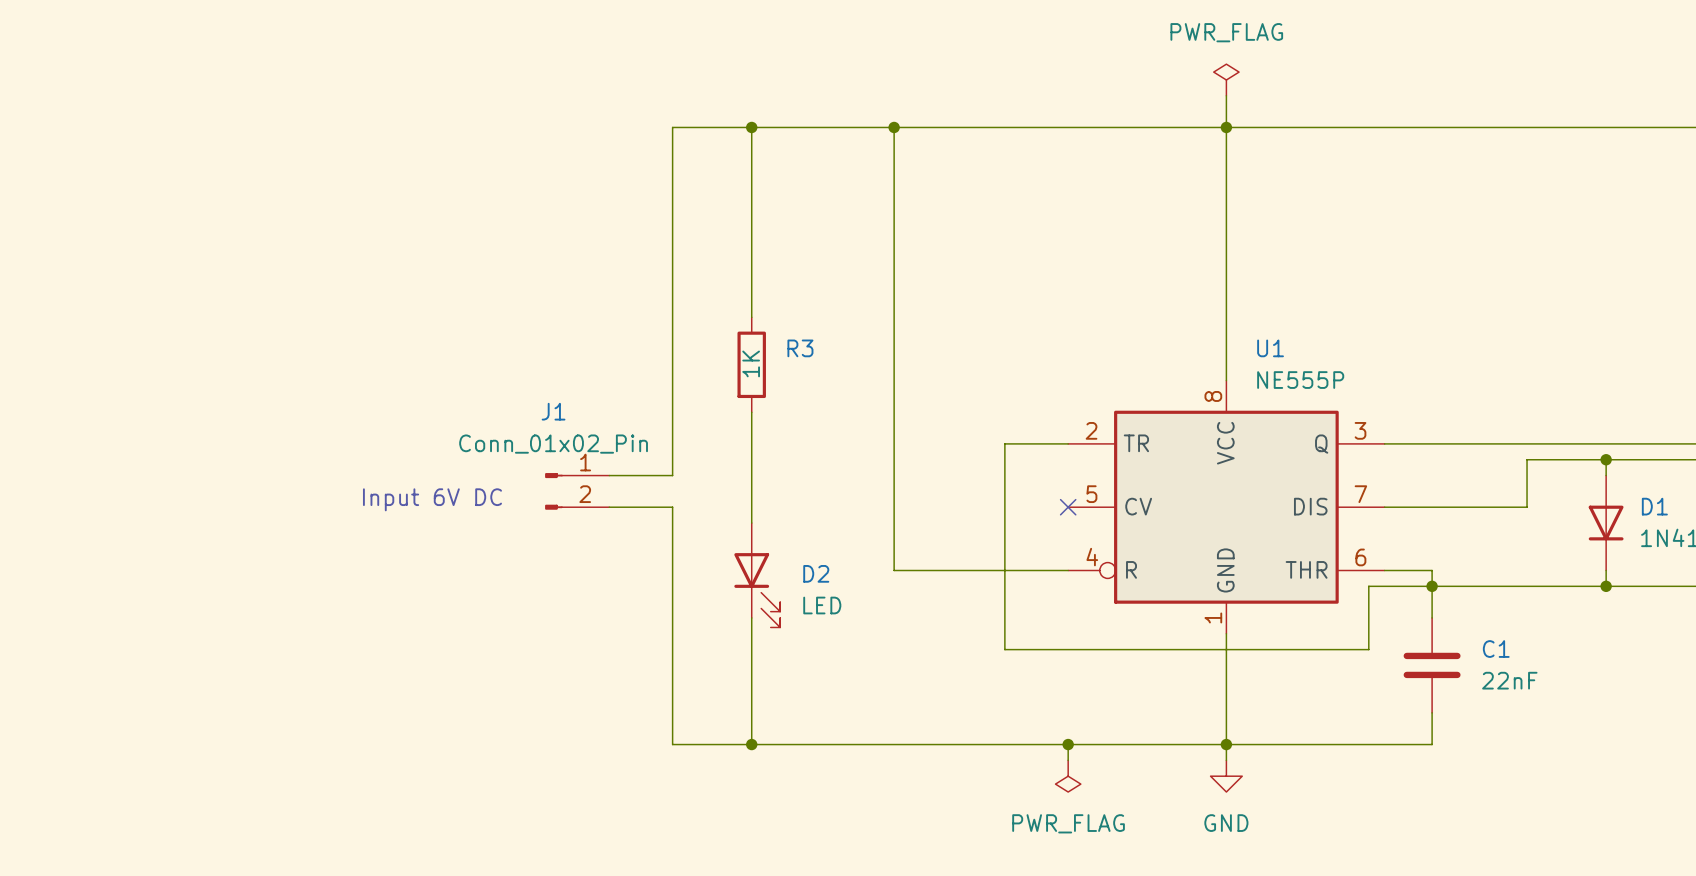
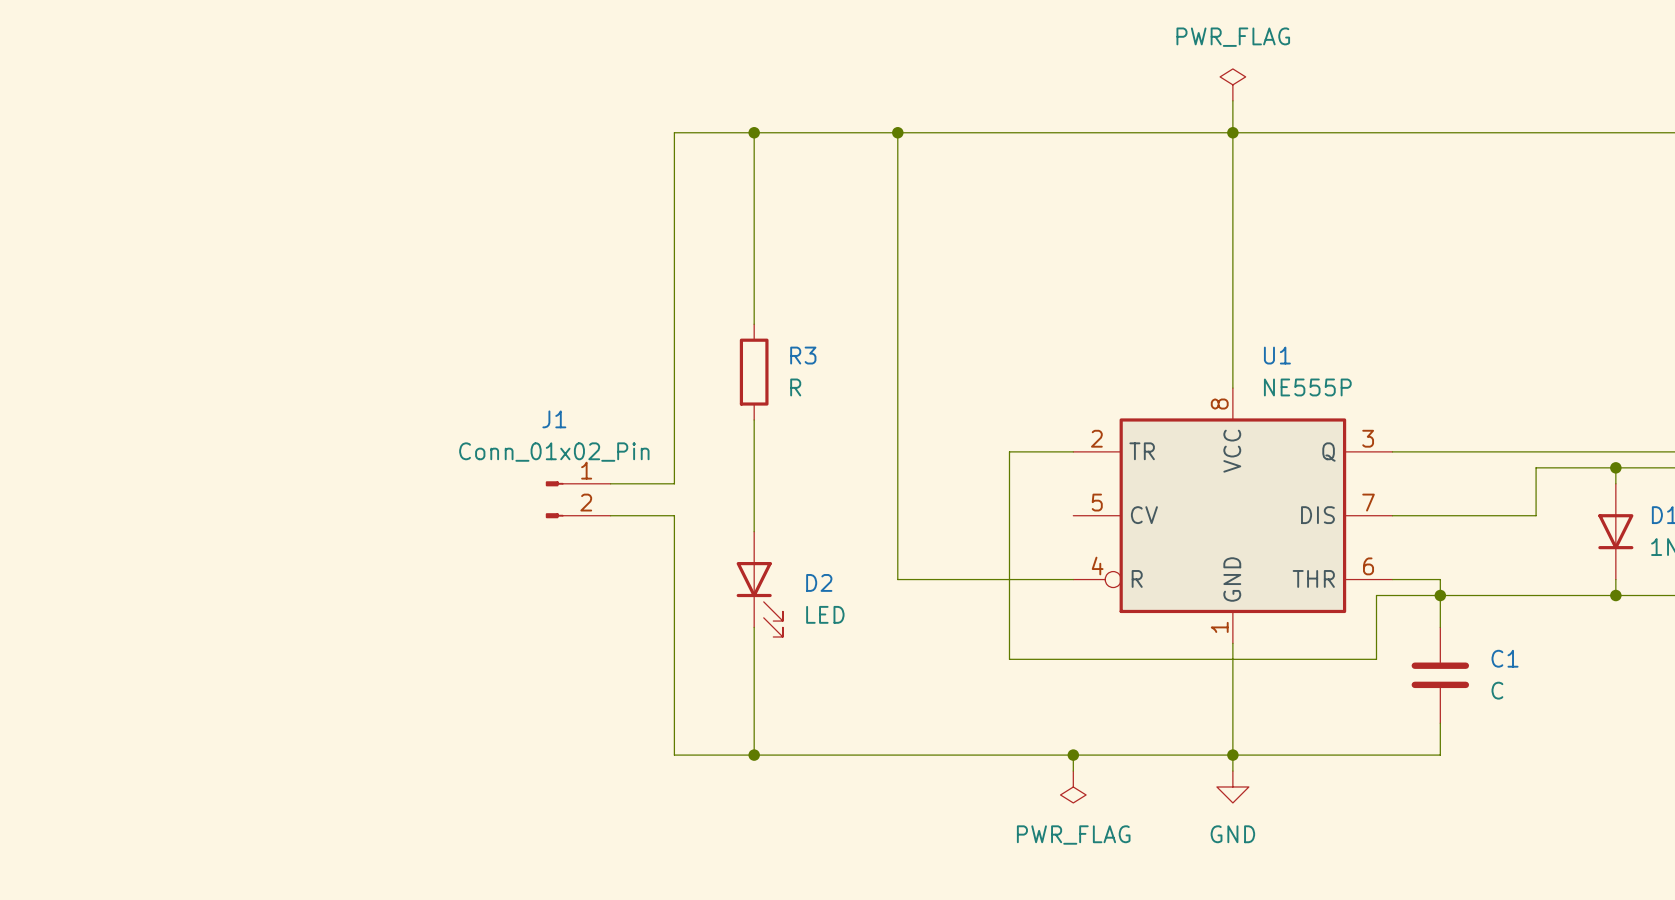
R3 value: 1K (751, 363) -> R (795, 387)
text: Input 6V DC (432, 499) -> none
no-connect mark: (1068, 507) -> none
C1 value: 22nF (1509, 680) -> C (1497, 690)

